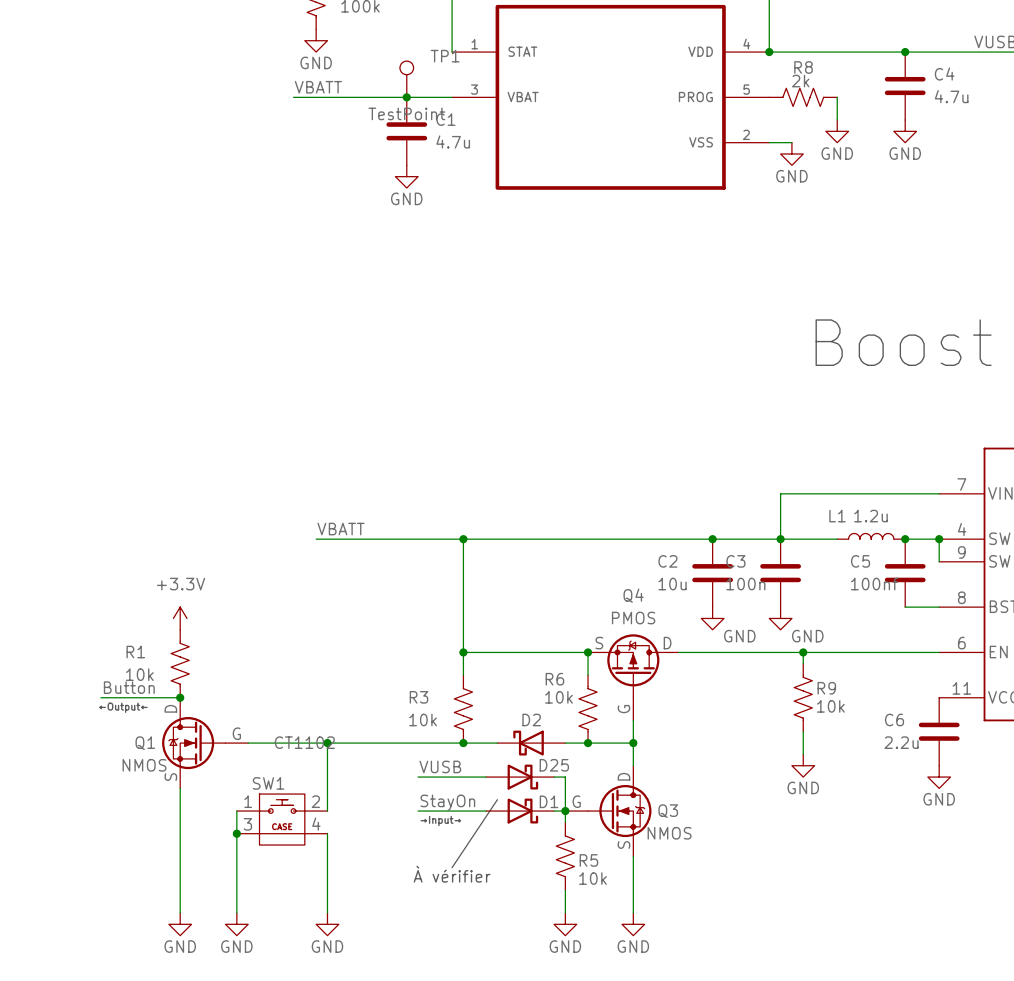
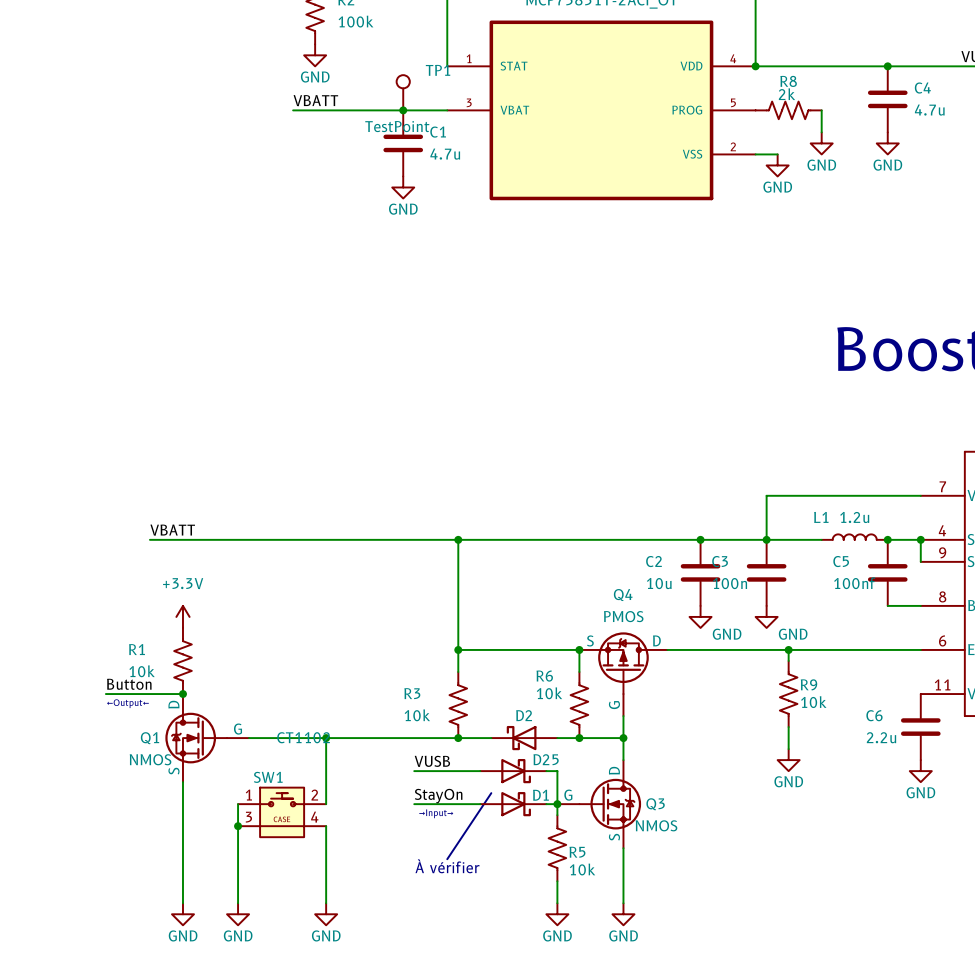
label position: VBATT (341, 529) -> VBATT (172, 530)
wire: none -> (149, 539) (315, 539)

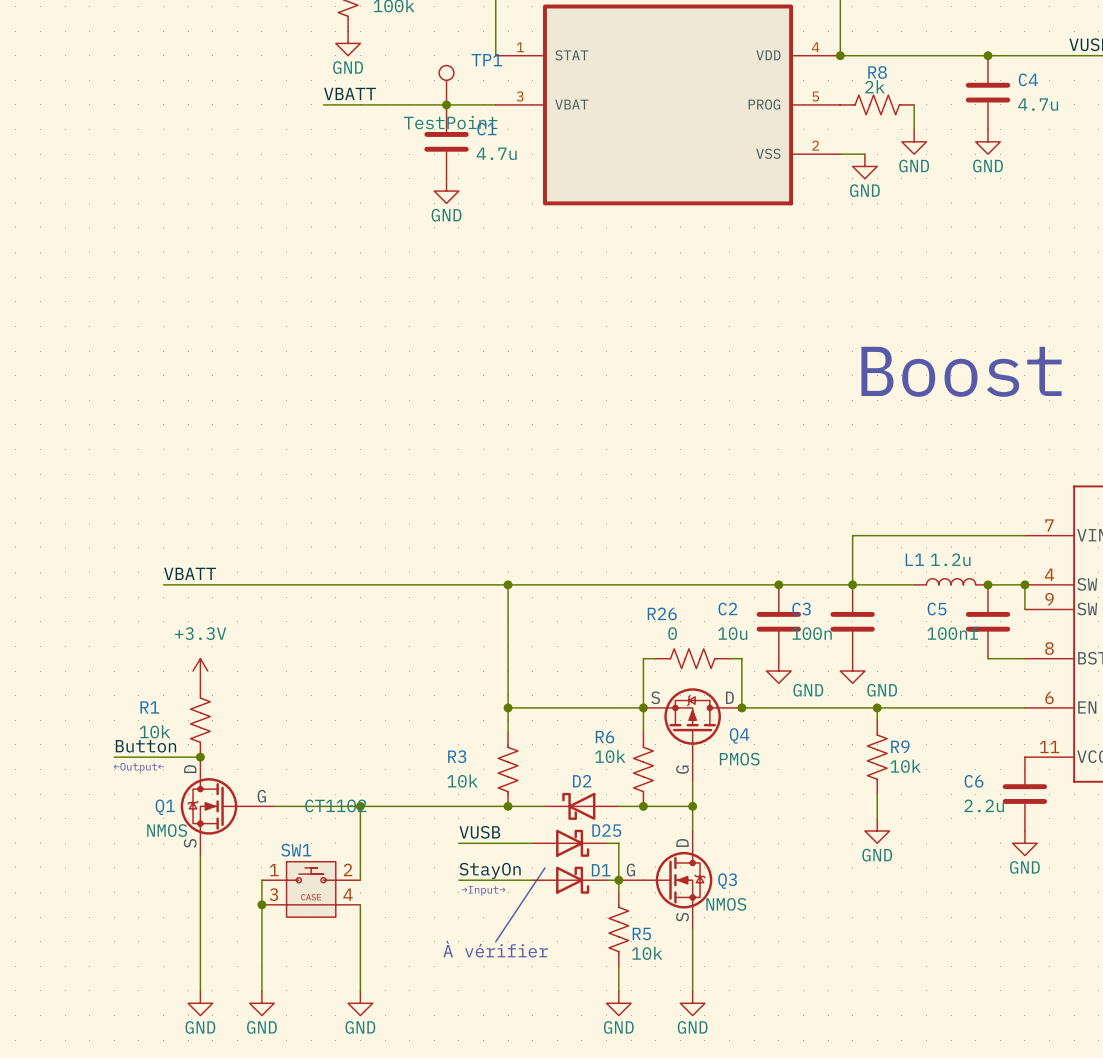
Q4 name position: Q4 (623, 595) -> Q4 (739, 735)
wire: none -> (655, 658) (643, 658) (643, 707)
R26: none -> 0 (692, 658)
wire: none -> (729, 658) (741, 658) (741, 707)
Q4 value position: PMOS (623, 616) -> PMOS (739, 759)
junction: none -> (741, 707)

